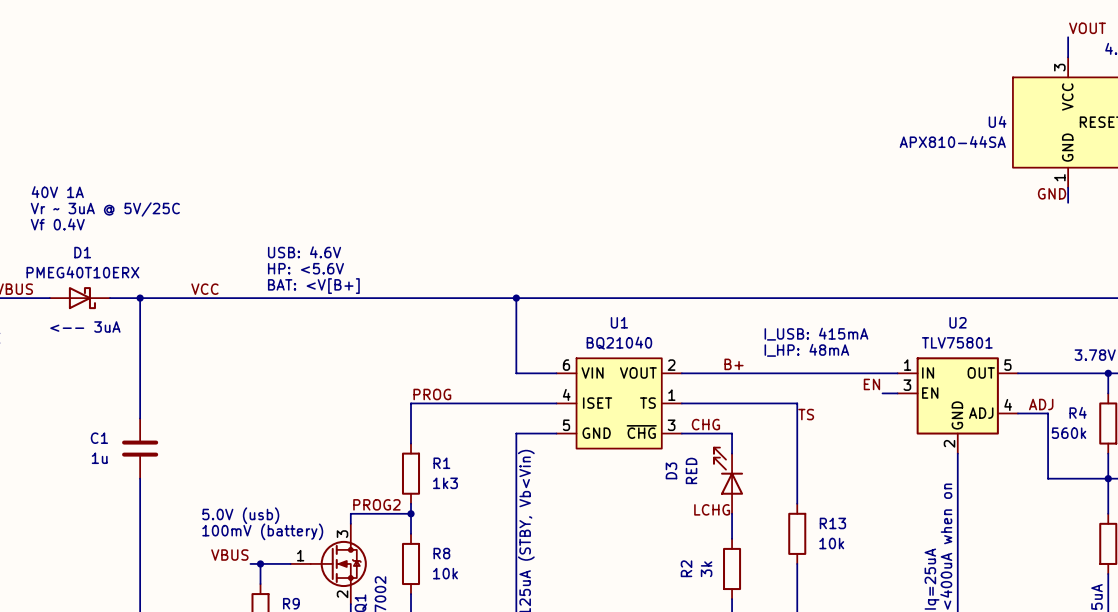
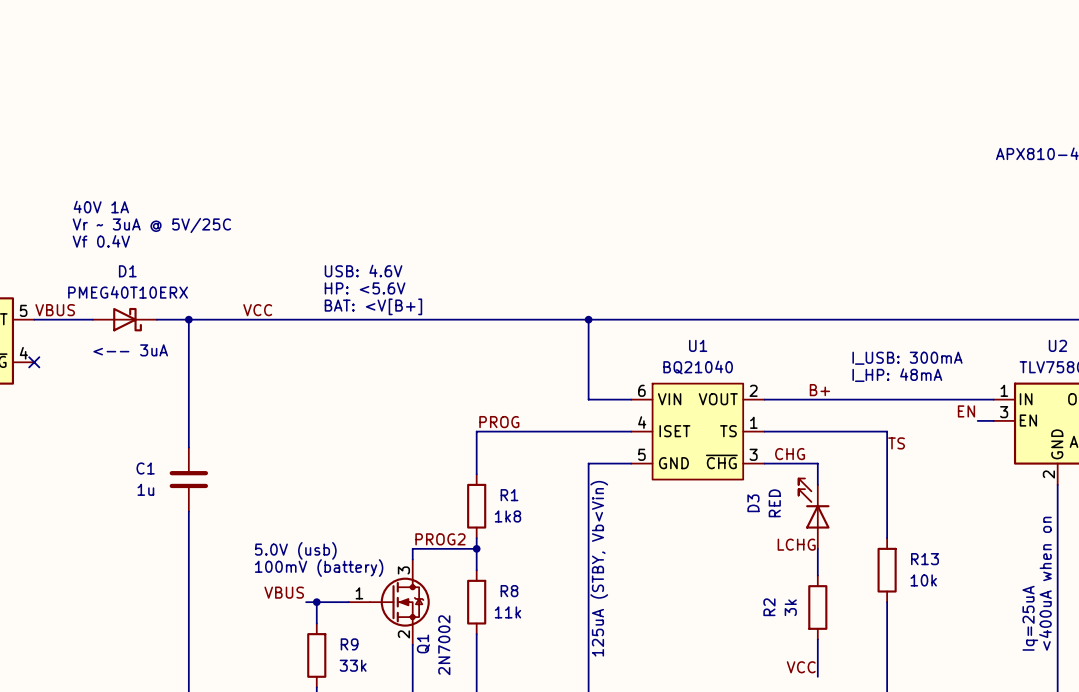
text: I_USB: 415mA (816, 334) -> I_USB: 300mA (907, 358)
R1 value: 1k3 (445, 483) -> 1k8 (507, 516)
R8 value: 10k (445, 573) -> 11k (507, 612)

